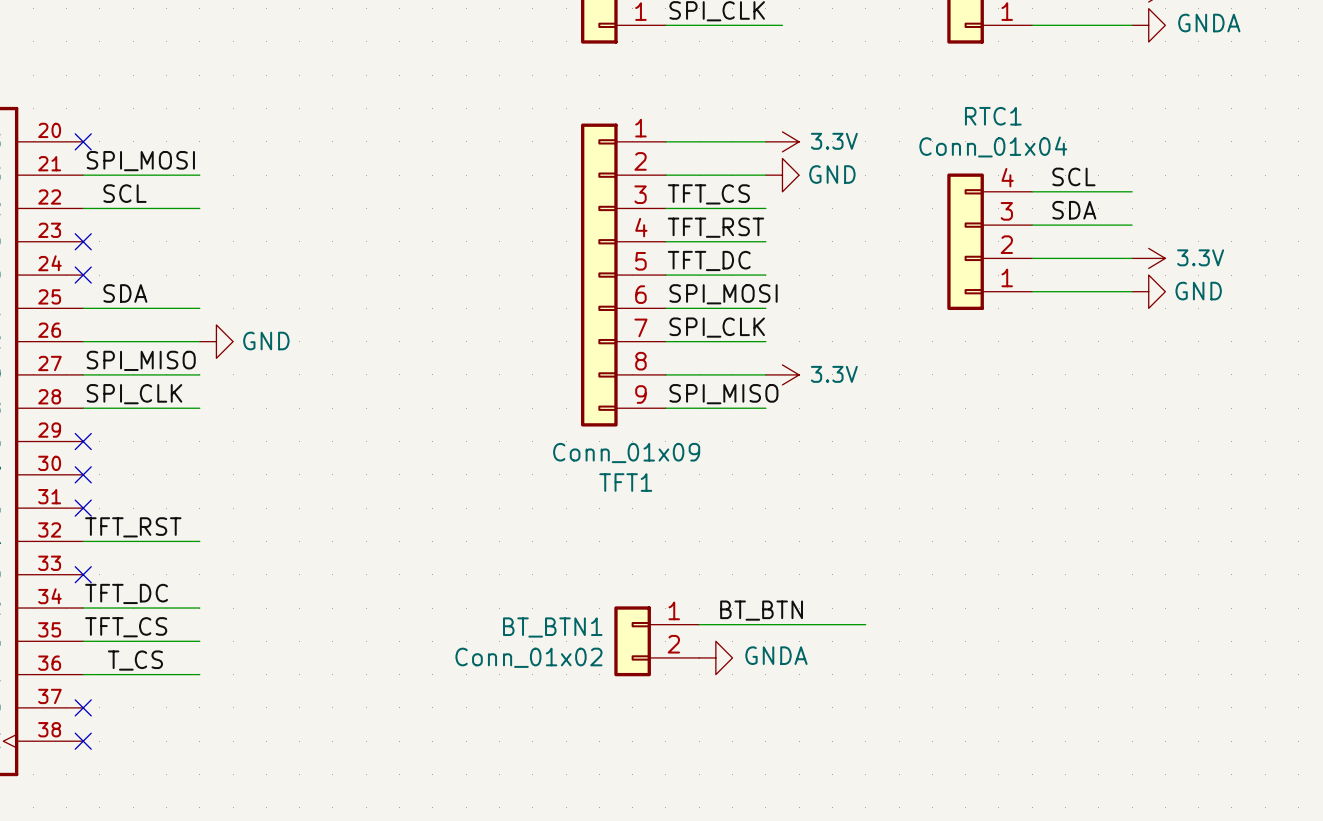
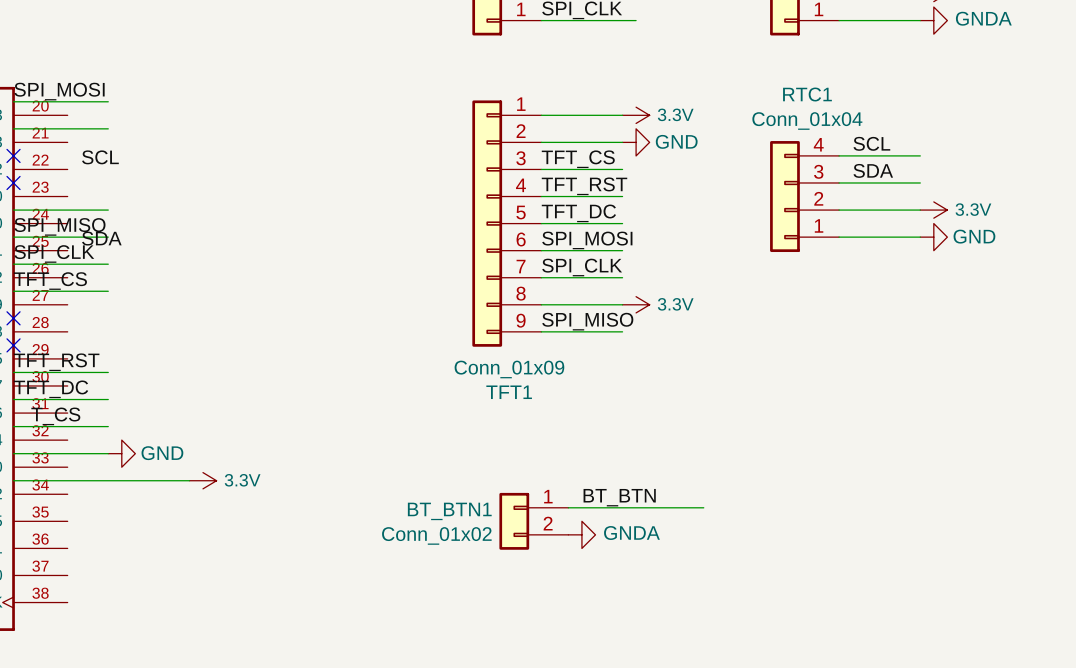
no-connect mark: (83, 141) -> none
label position: SPI_MOSI (140, 161) -> SPI_MOSI (59, 91)
wire: (83, 175) (199, 175) -> (13, 101) (108, 101)
no-connect mark: none -> (13, 155)
wire: (83, 208) (199, 208) -> (13, 128) (108, 128)
no-connect mark: none -> (13, 182)
no-connect mark: (83, 241) -> none
no-connect mark: (83, 275) -> none
wire: (83, 308) (199, 308) -> (13, 210) (108, 210)
wire: (83, 341) (199, 341) -> (13, 237) (108, 237)
power symbol position: GND (216, 341) -> GND (121, 453)
label position: SPI_MISO (141, 360) -> SPI_MISO (59, 226)
wire: (83, 374) (199, 374) -> (13, 264) (108, 264)
no-connect mark: none -> (13, 318)
label position: SPI_CLK (134, 394) -> SPI_CLK (54, 253)
wire: (83, 408) (199, 408) -> (13, 291) (108, 291)
no-connect mark: none -> (13, 345)
no-connect mark: (83, 441) -> none
no-connect mark: (83, 474) -> none
no-connect mark: (83, 508) -> none
label position: TFT_RST (133, 527) -> TFT_RST (56, 362)
wire: (83, 541) (199, 541) -> (13, 399) (108, 399)
no-connect mark: (83, 574) -> none
wire: none -> (13, 480) (189, 480)
power symbol: none -> 3.3V (203, 480)
label position: TFT_DC (126, 593) -> TFT_DC (51, 389)
wire: (83, 608) (199, 608) -> (13, 453) (108, 453)
label position: TFT_CS (126, 627) -> TFT_CS (50, 281)
wire: (83, 641) (199, 641) -> (13, 426) (108, 426)
label position: T_CS (135, 660) -> T_CS (55, 416)
wire: (83, 674) (199, 674) -> (13, 372) (108, 372)
no-connect mark: (83, 707) -> none
no-connect mark: (83, 741) -> none

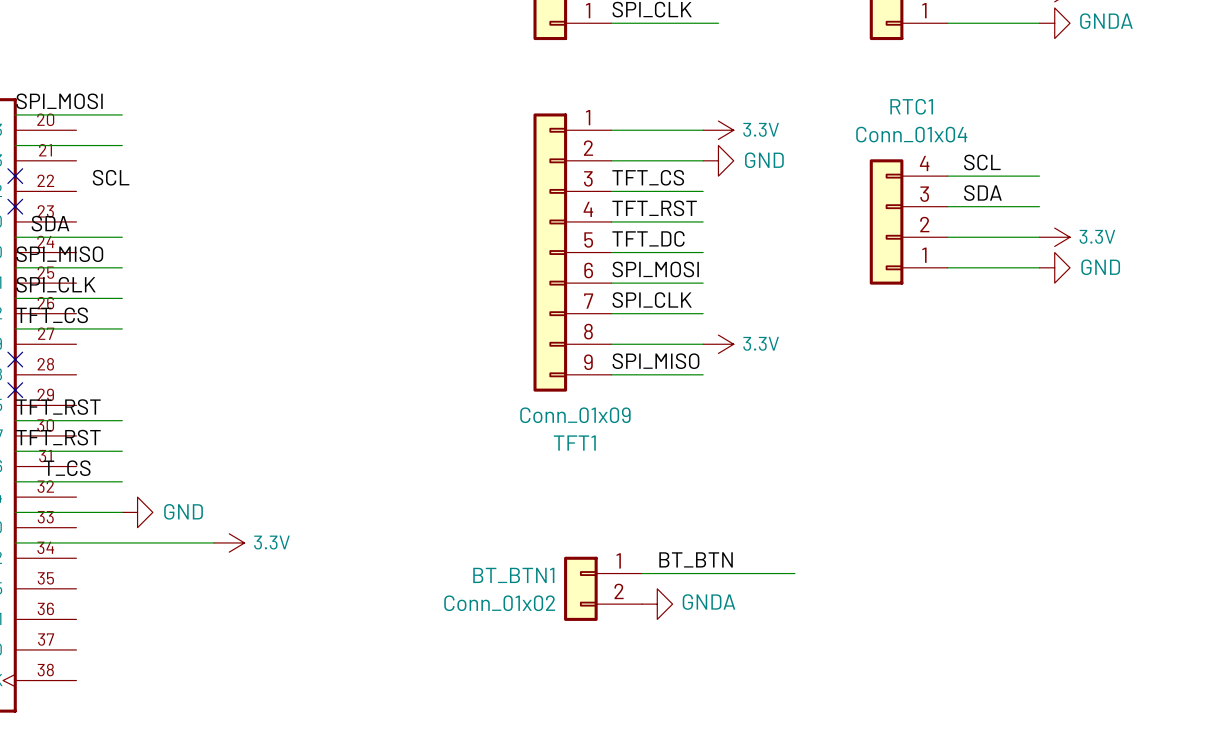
label position: SDA (101, 238) -> SDA (50, 223)
label: TFT_DC (51, 389) -> TFT_RST (58, 437)

